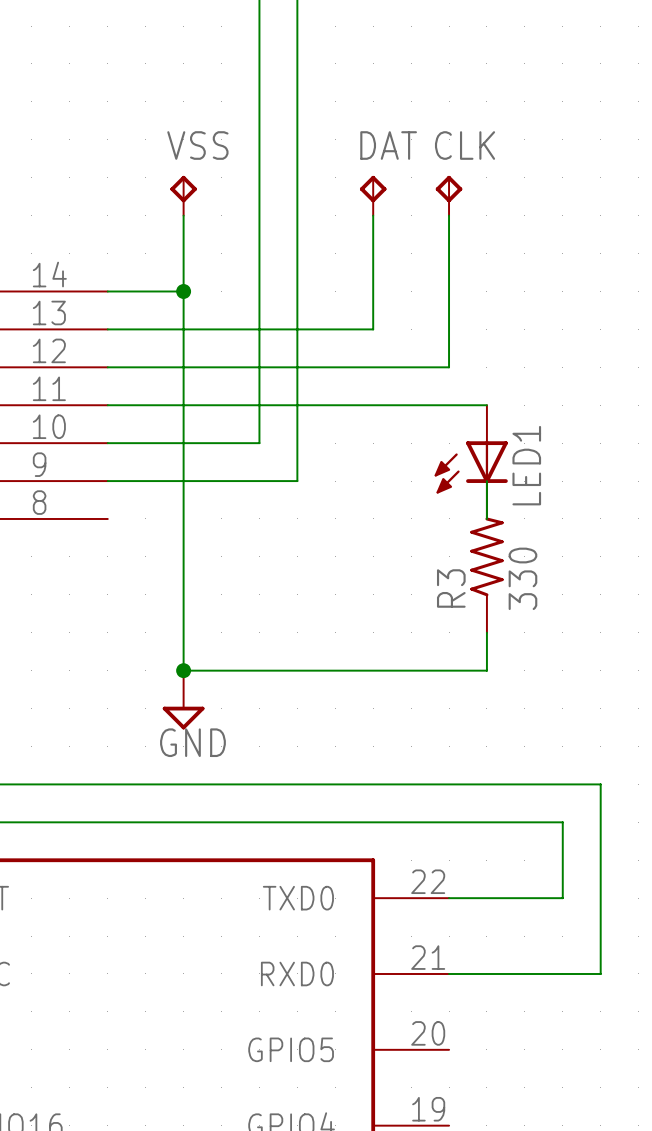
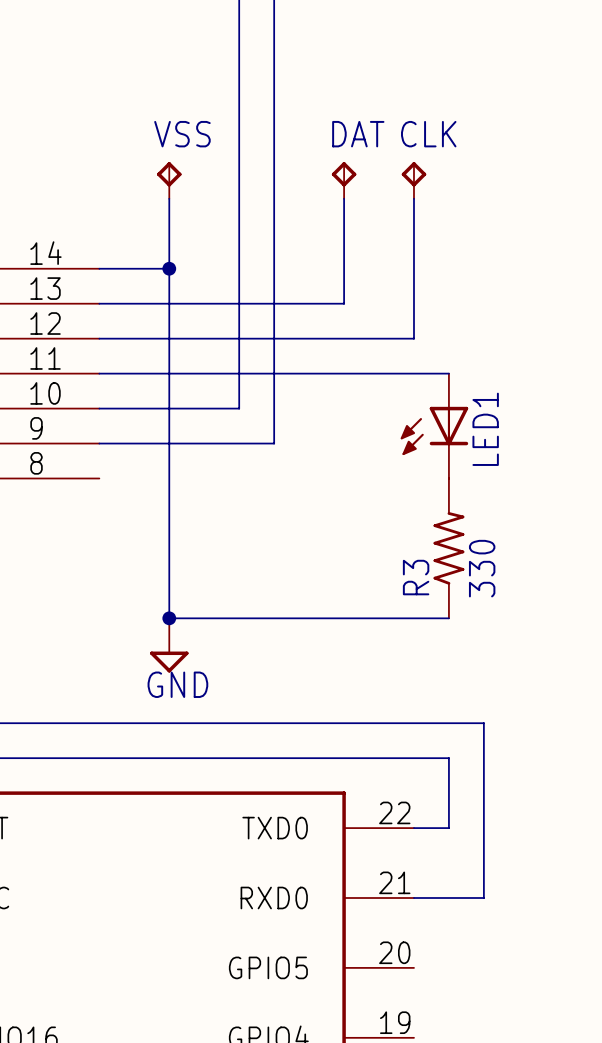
R3 position: (486, 556) -> (448, 548)
wire: (524, 784) (600, 784) (600, 973) (524, 973) -> (483, 723) (483, 898)
wire: (486, 822) (562, 822) (562, 898) (486, 898) -> (448, 758) (448, 828)

